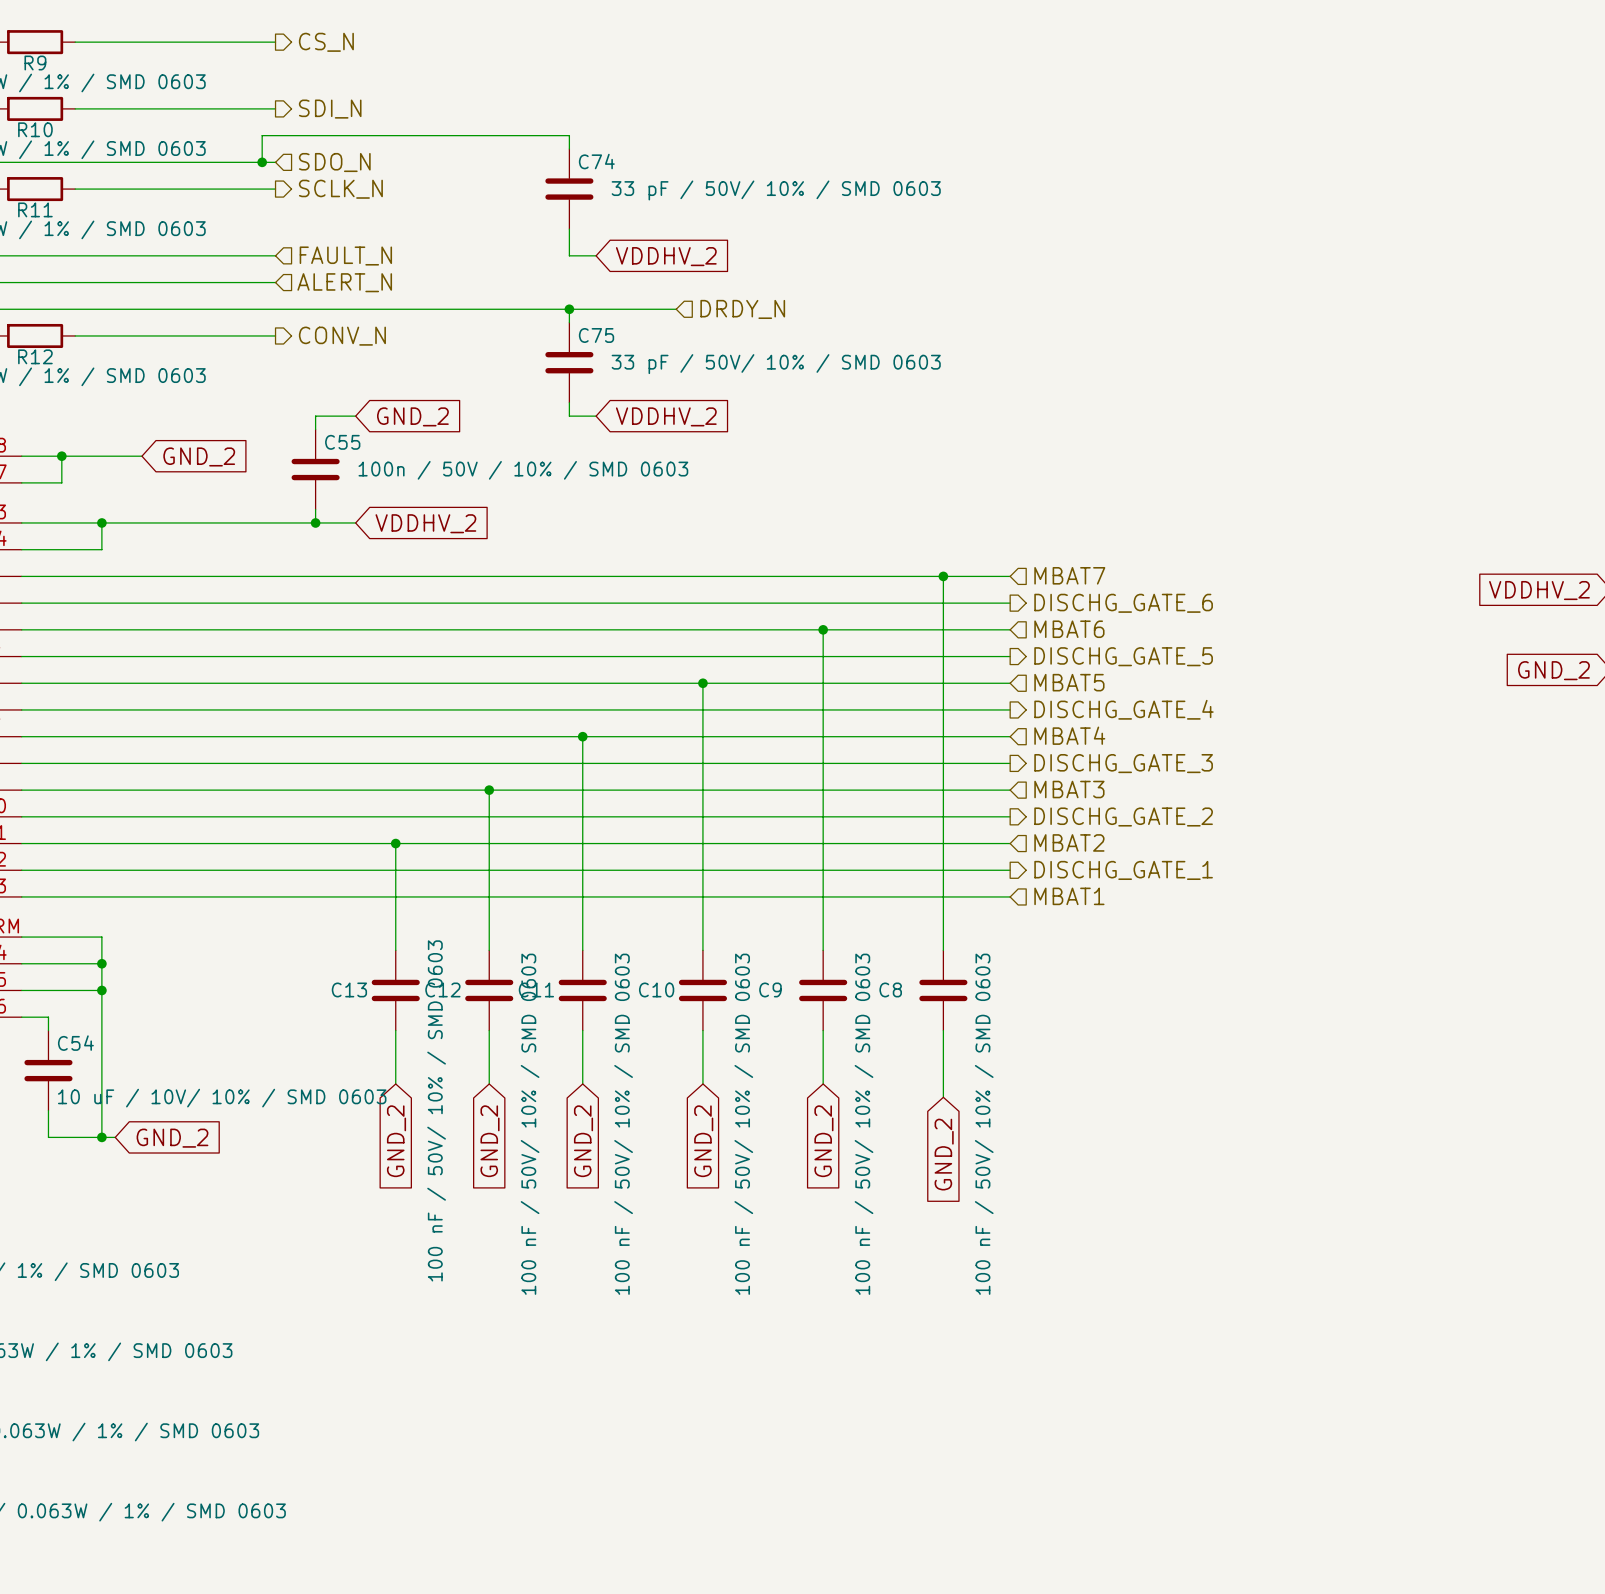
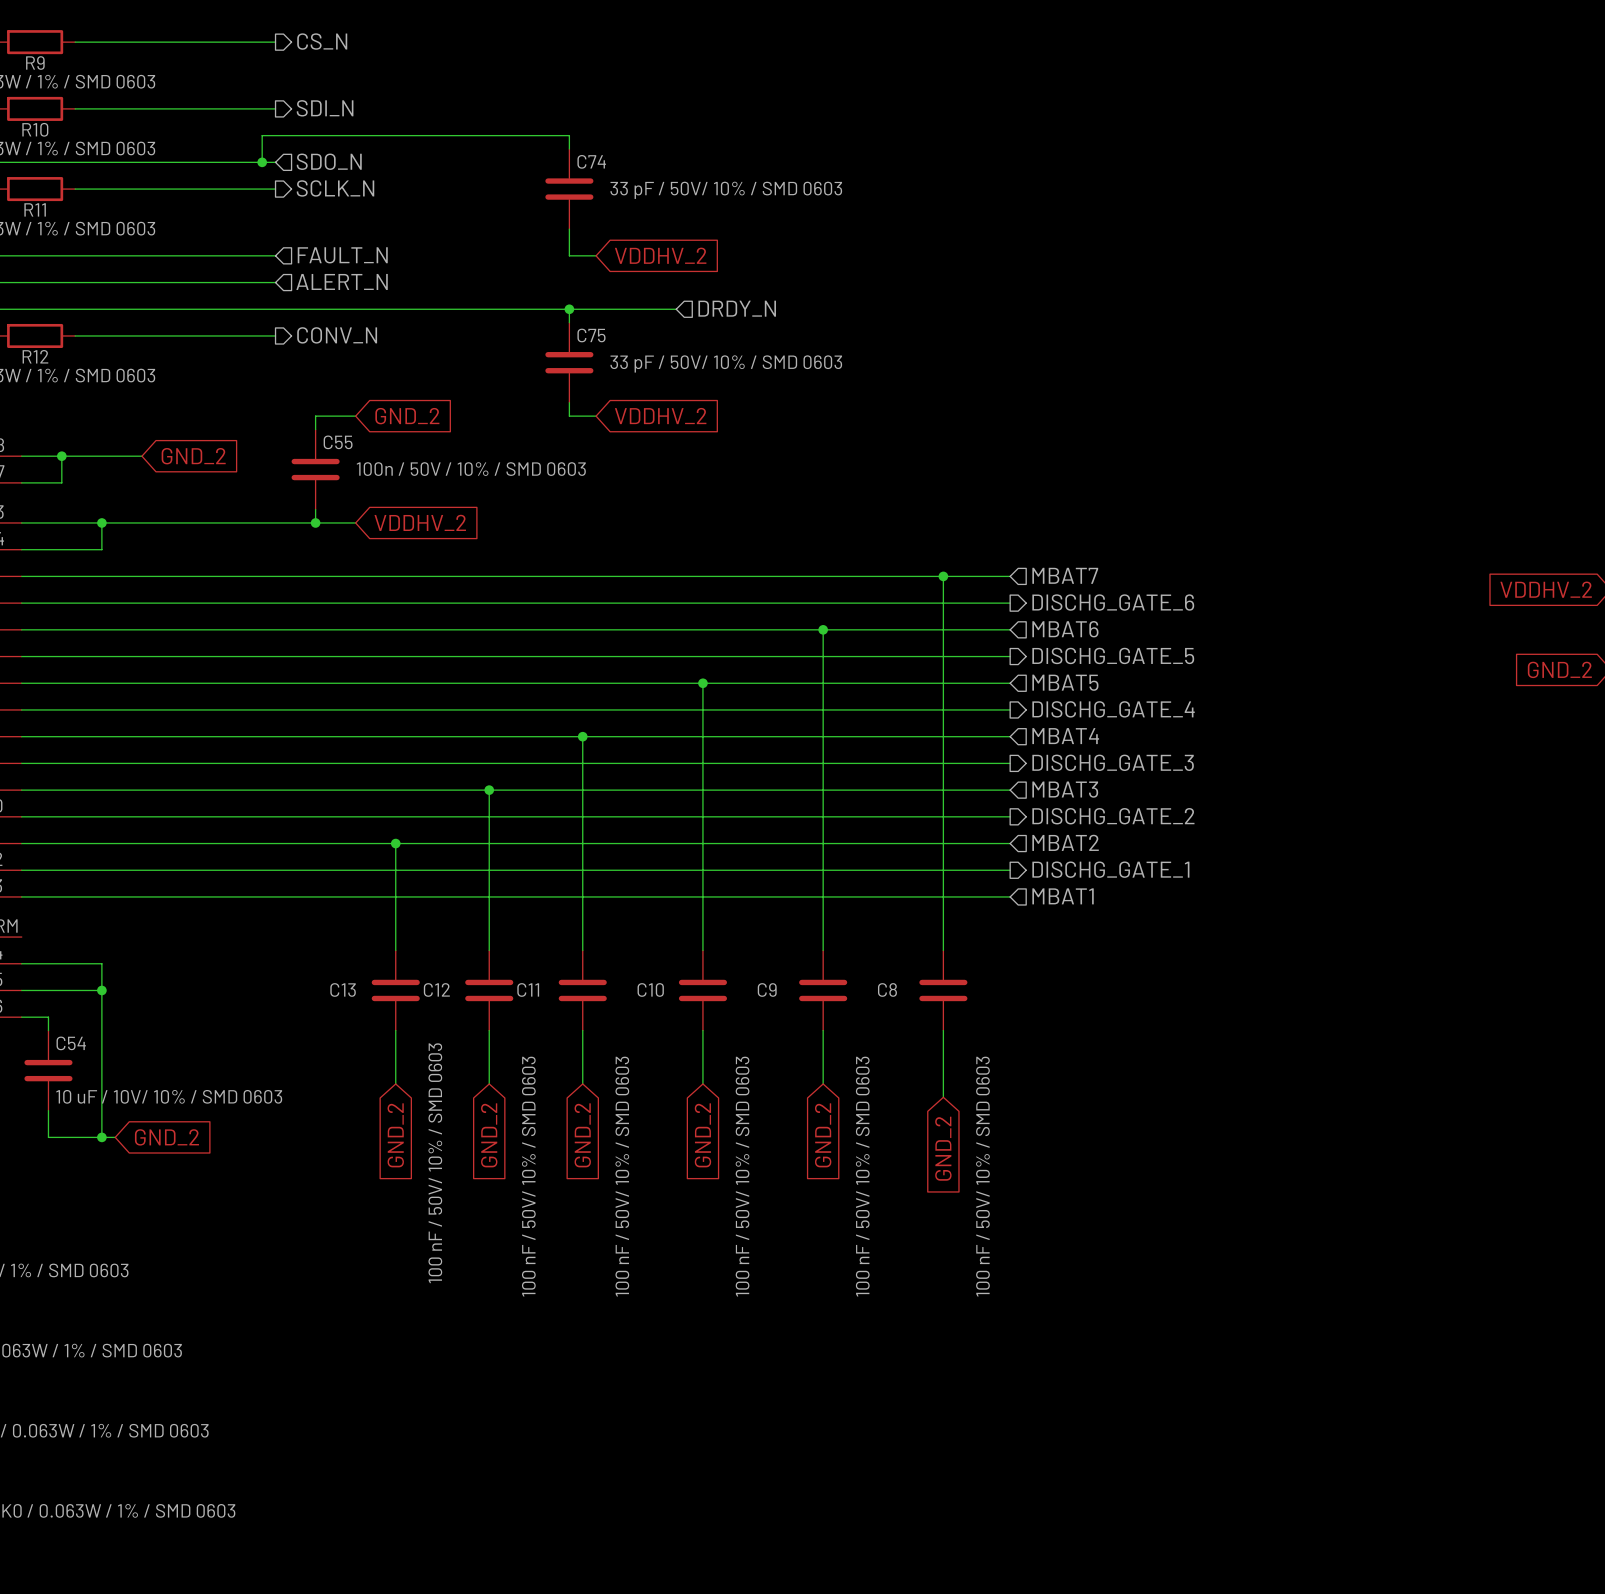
wire: (21, 937) (101, 937) (101, 963) -> none
junction: (101, 963) -> none

